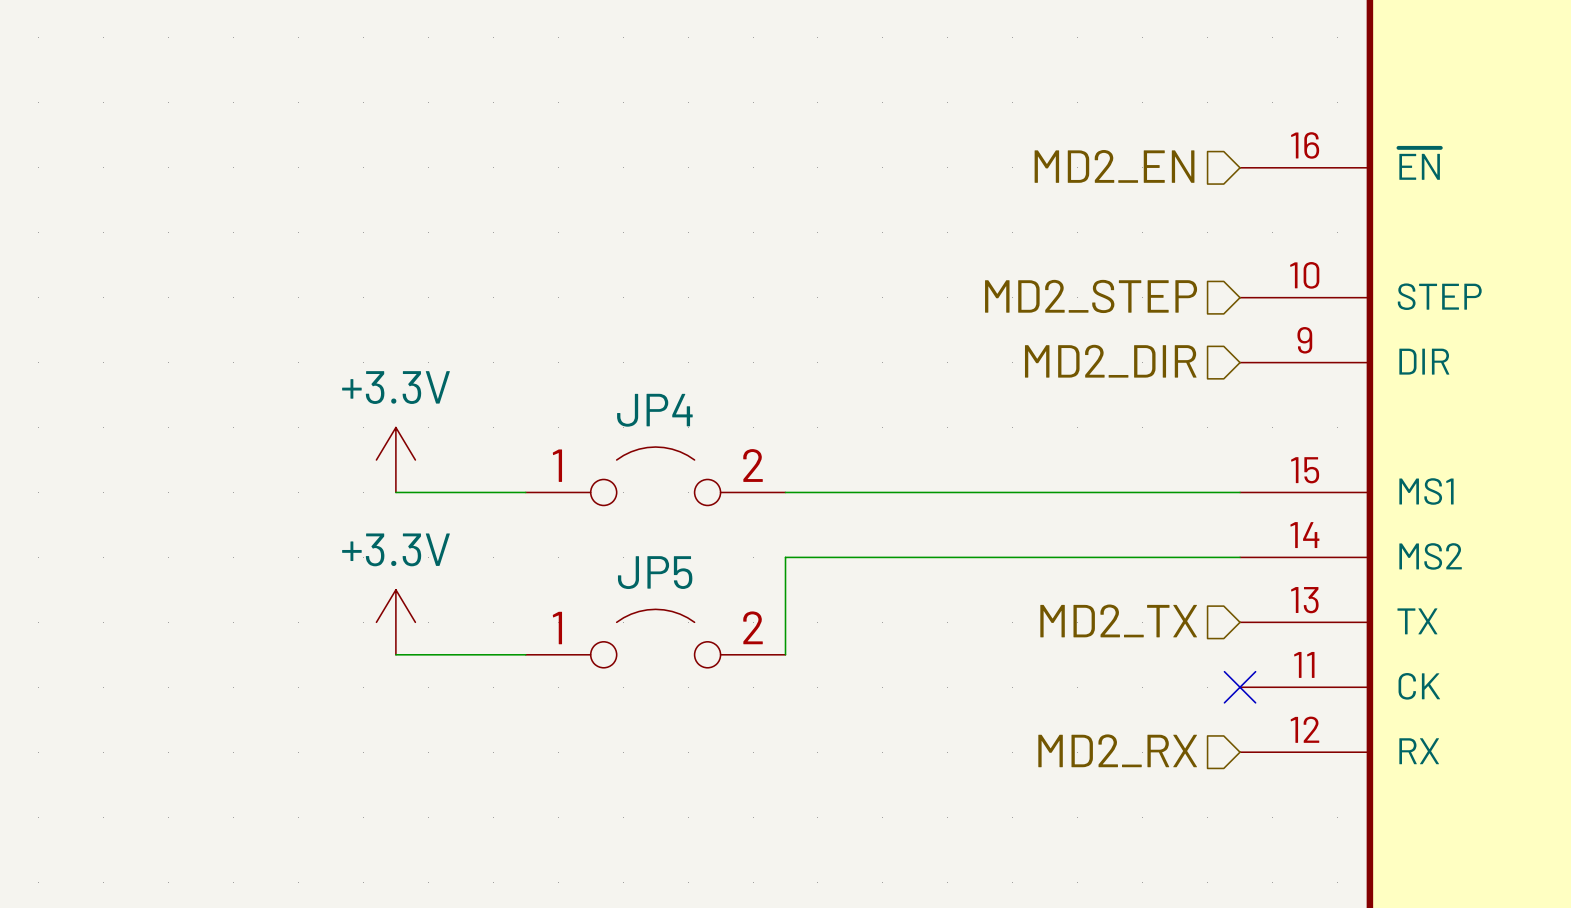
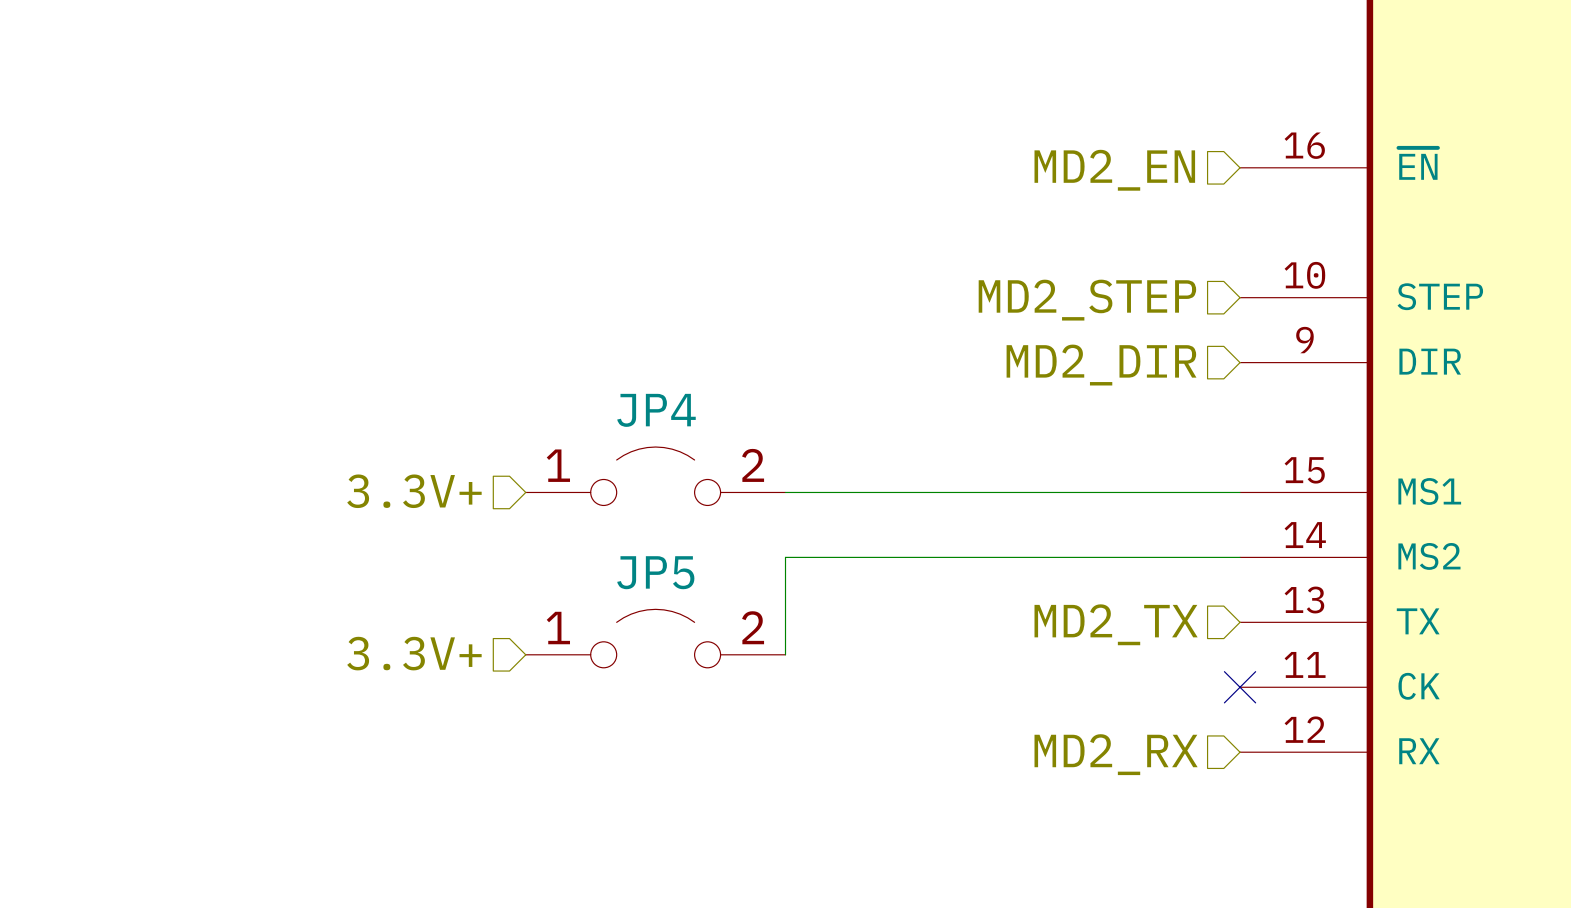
power symbol: +3.3V (395, 460) -> none
hierarchical label: none -> 3.3V+ (414, 491)
wire: (395, 492) (525, 492) -> none
power symbol: +3.3V (395, 622) -> none
hierarchical label: none -> 3.3V+ (414, 653)
wire: (395, 654) (525, 654) -> none

